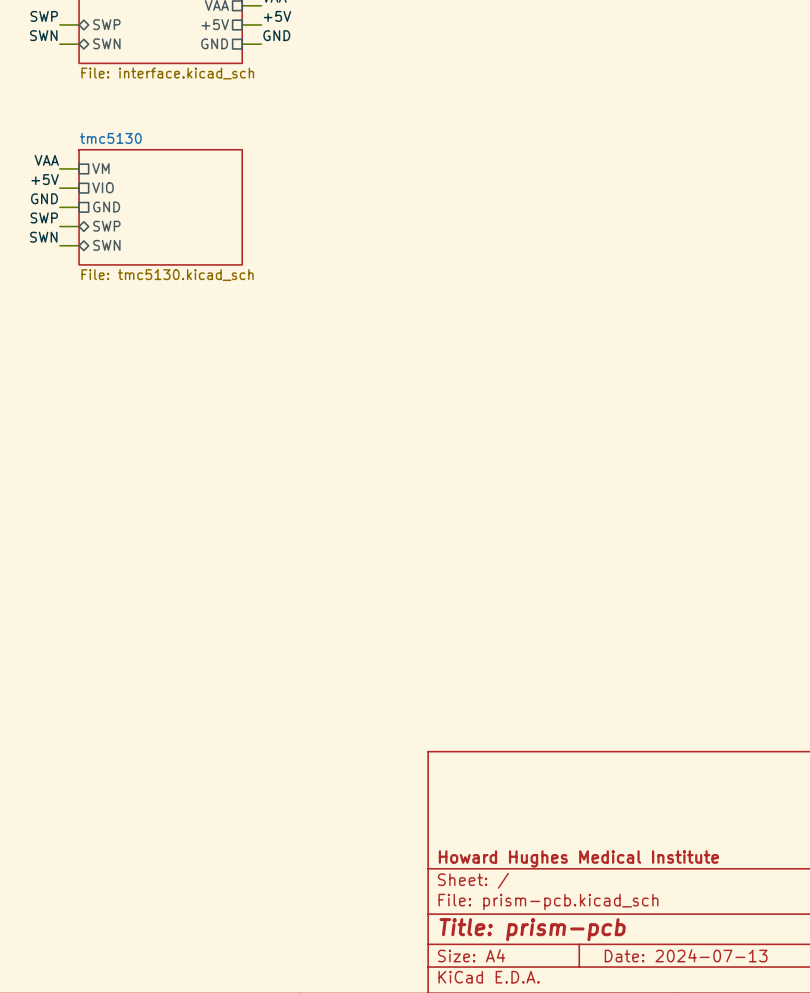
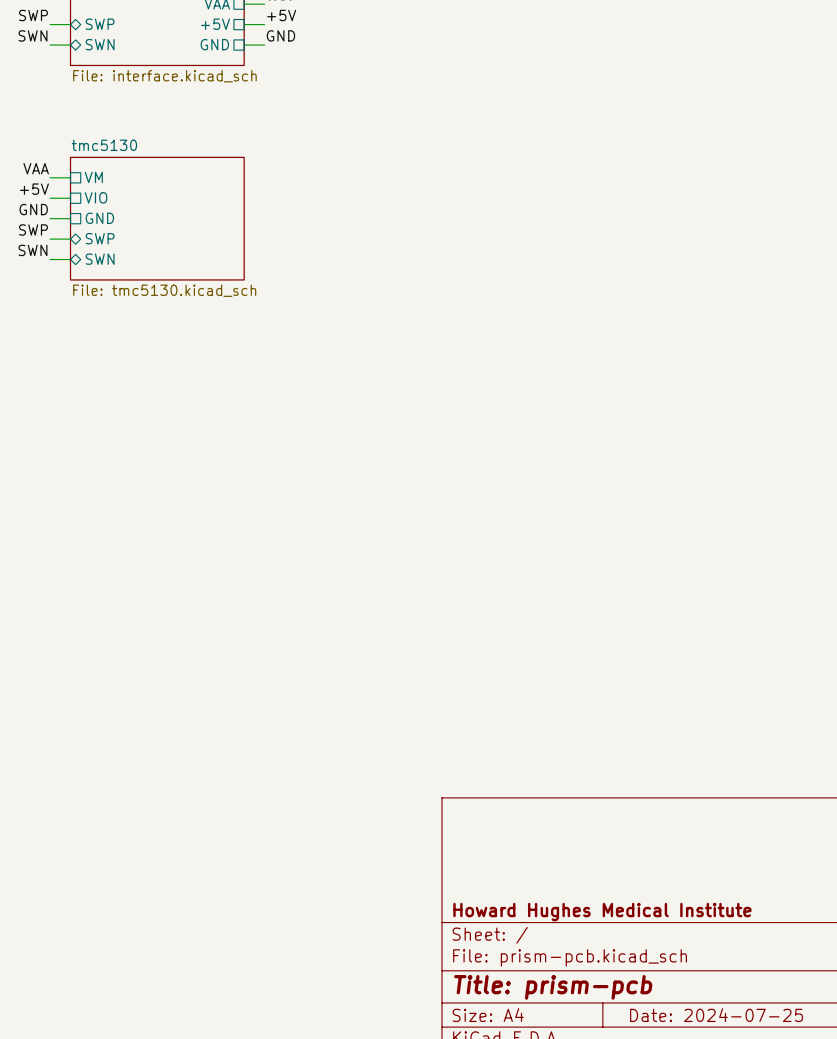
title block: Date: 2024-07-13 (686, 955) -> Date: 2024-07-25 (716, 1015)

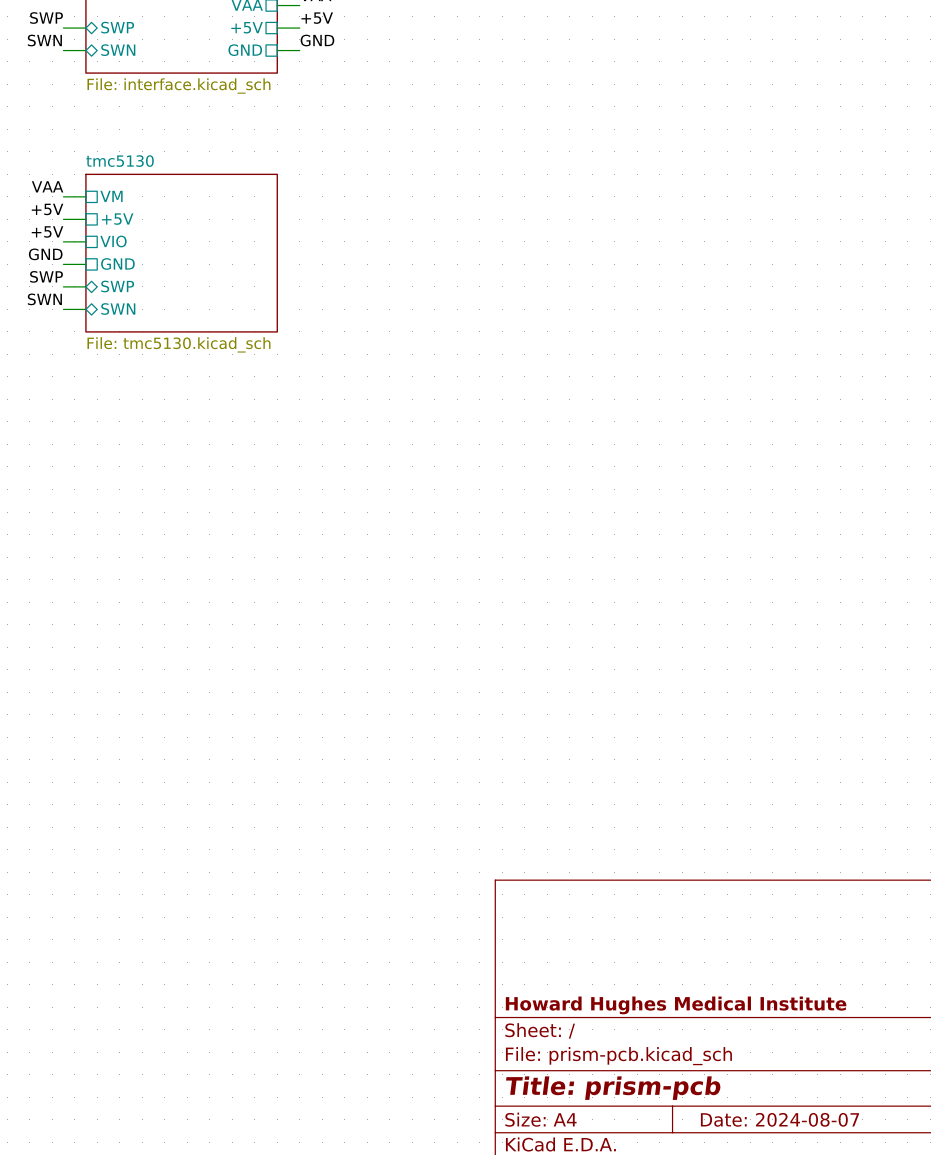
sheet tmc5130 shape: [69, 156, 245, 281] -> [85, 173, 278, 333]
sheet pin: VIO (95, 197) -> +5V (117, 219)
label: GND (33, 209) -> +5V (47, 231)
sheet pin: GND (99, 218) -> VIO (113, 241)
label: SWP (33, 229) -> GND (45, 254)
sheet pin shape: bidirectional (100, 238) -> passive (117, 263)
sheet pin: SWP (100, 238) -> GND (117, 263)
label: SWN (32, 250) -> SWP (46, 276)
sheet pin: SWN (100, 259) -> SWP (117, 286)
label: none -> SWN (44, 299)
wire: none -> (63, 309) (85, 309)
sheet pin: none -> SWN (118, 309)
title block: Date: 2024-07-25 (716, 1015) -> Date: 2024-08-07 (779, 1119)

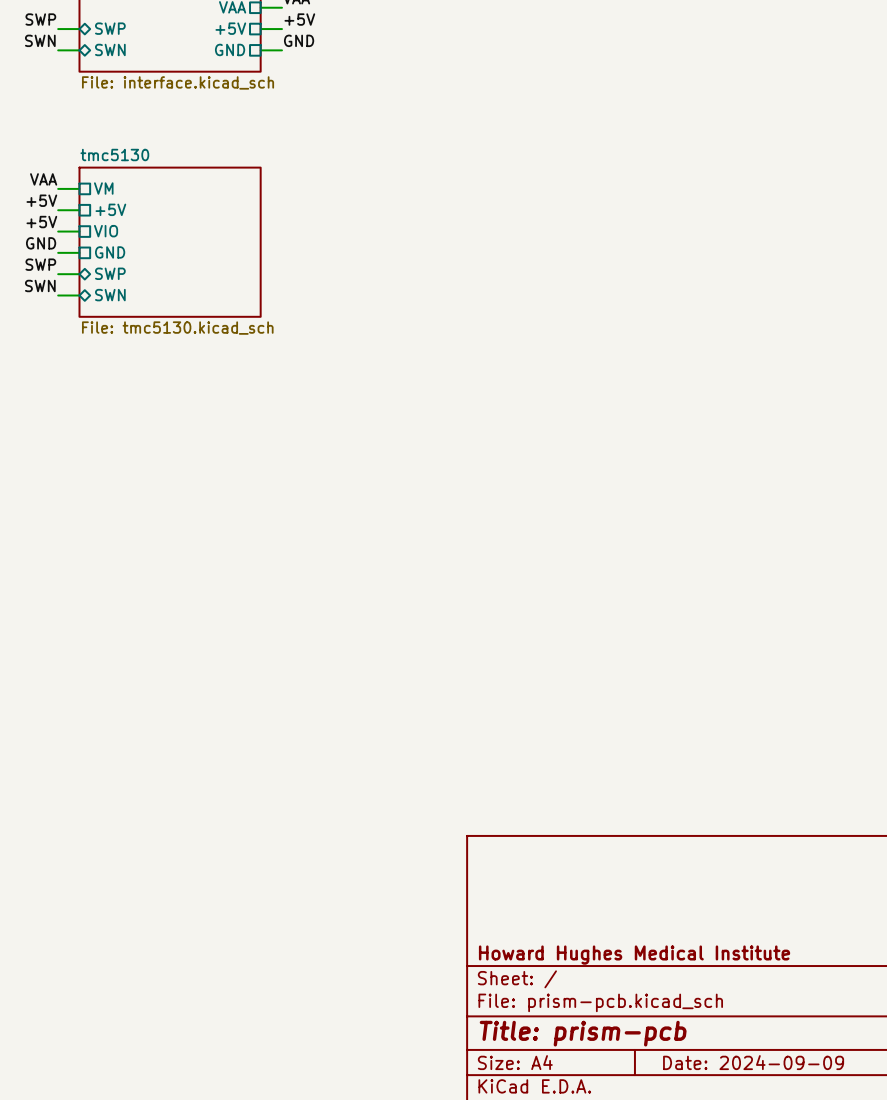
title block: Date: 2024-08-07 (779, 1119) -> Date: 2024-09-09 (753, 1062)

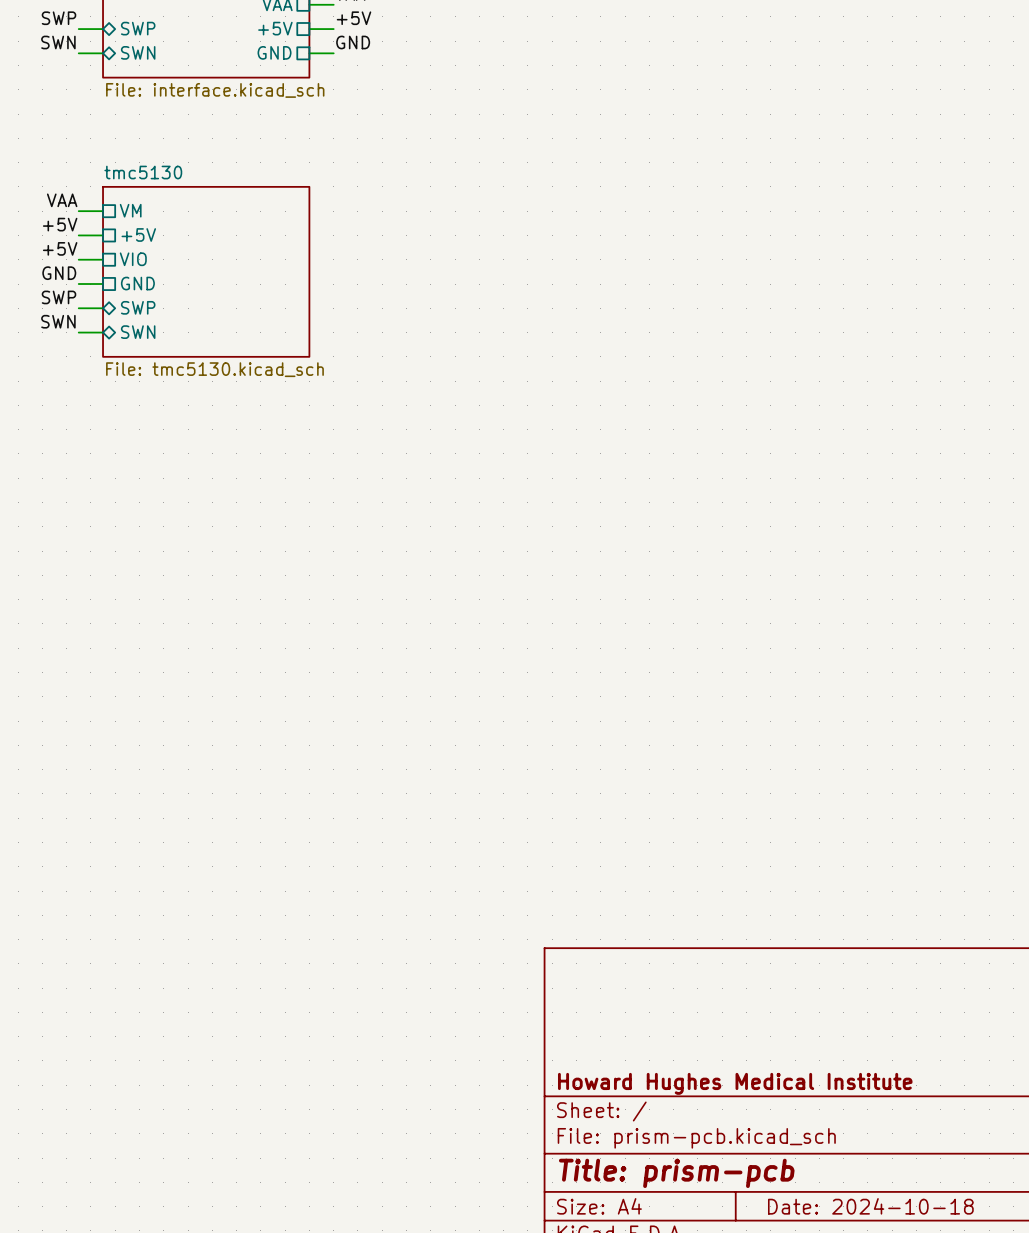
title block: Date: 2024-09-09 (753, 1062) -> Date: 2024-10-18 (870, 1206)

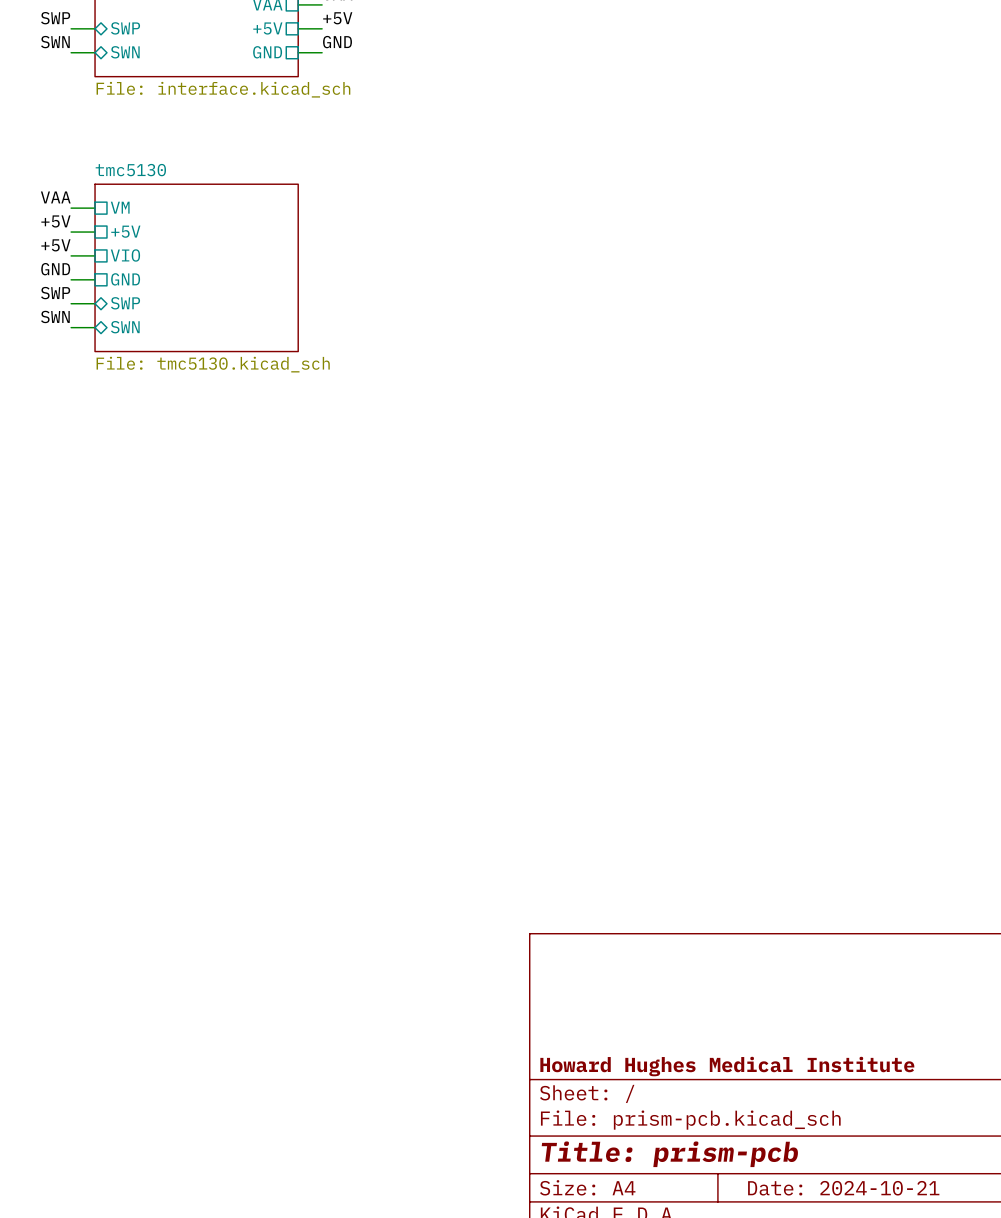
title block: Date: 2024-10-18 (870, 1206) -> Date: 2024-10-21 (843, 1188)

